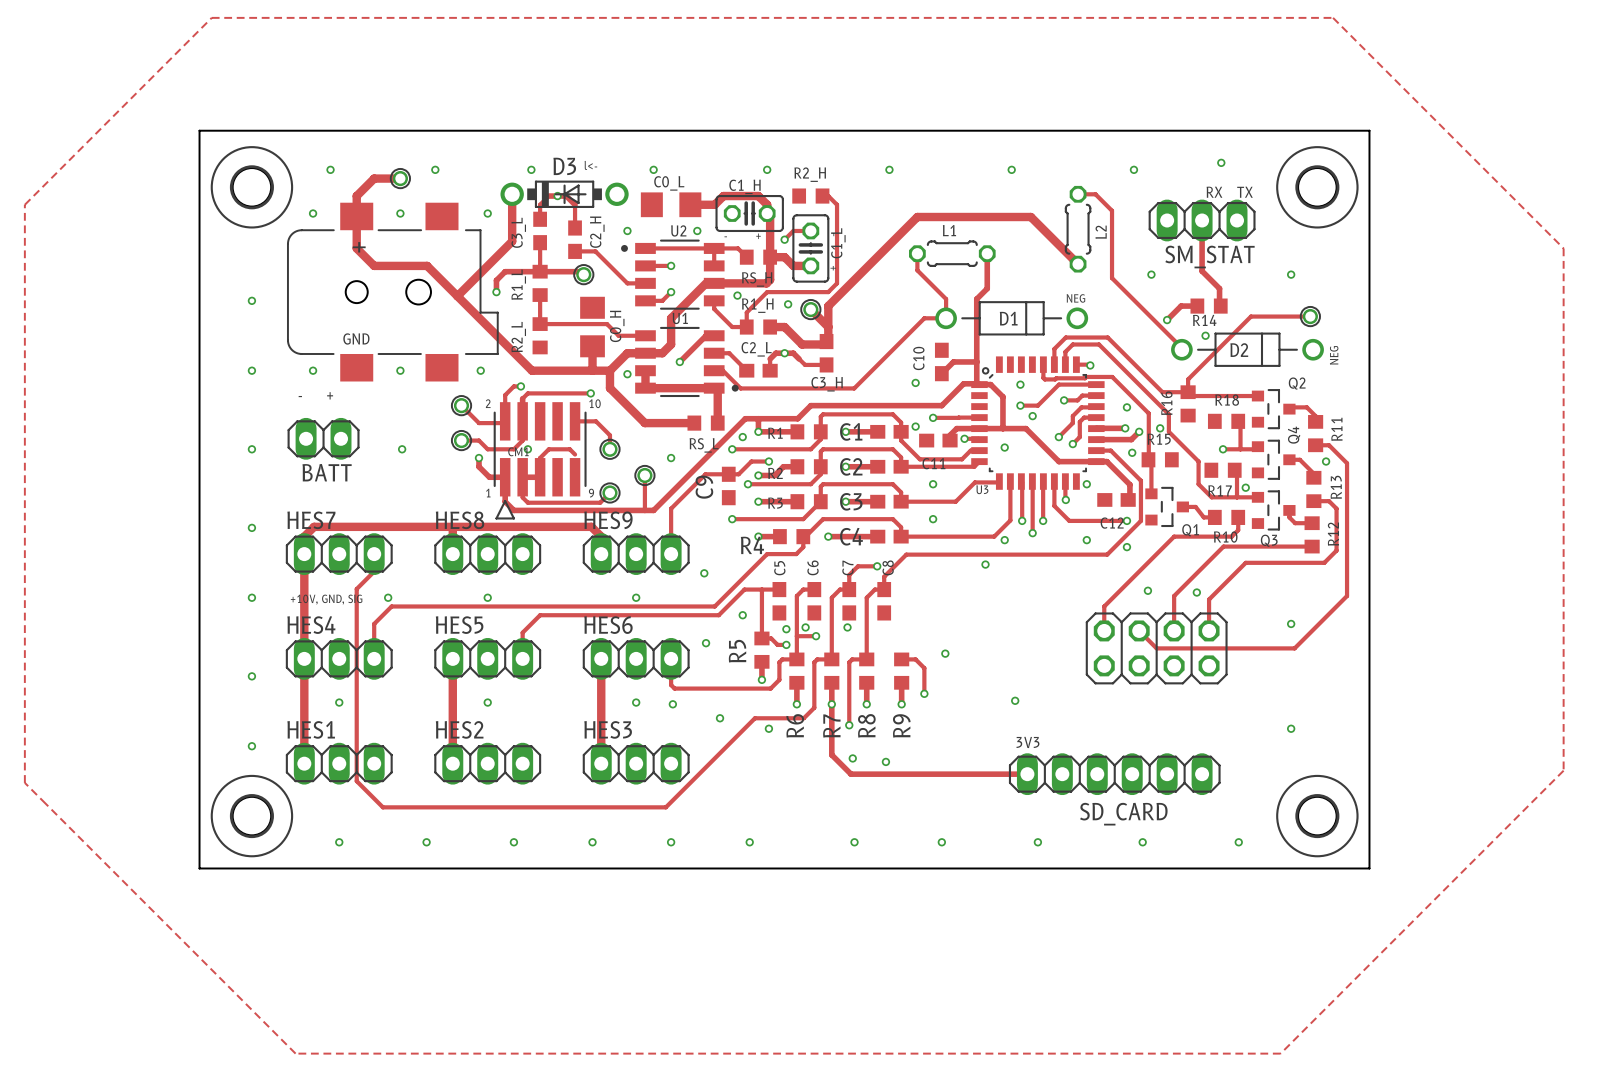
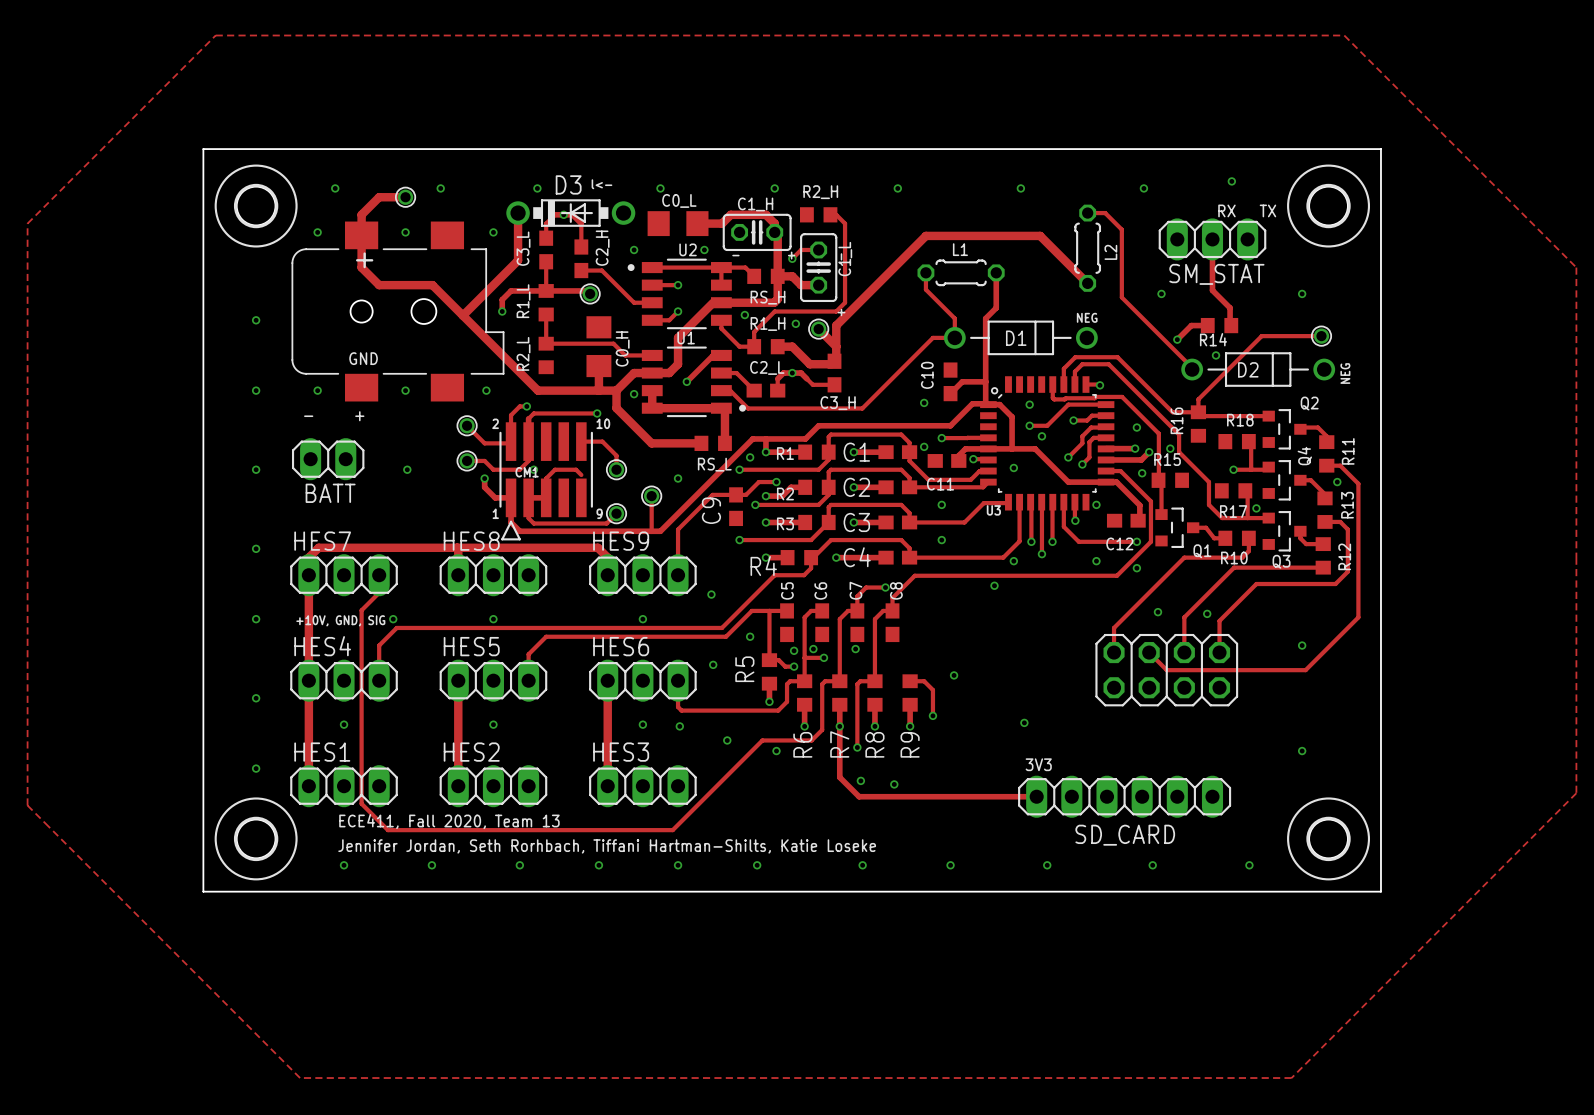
text: none -> ECE411, Fall 2020, Team 13 (449, 821)
text: none -> Jennifer Jordan, Seth Rorhbach, Tiffani Hartman-Shilts, Katie Loseke (607, 846)

